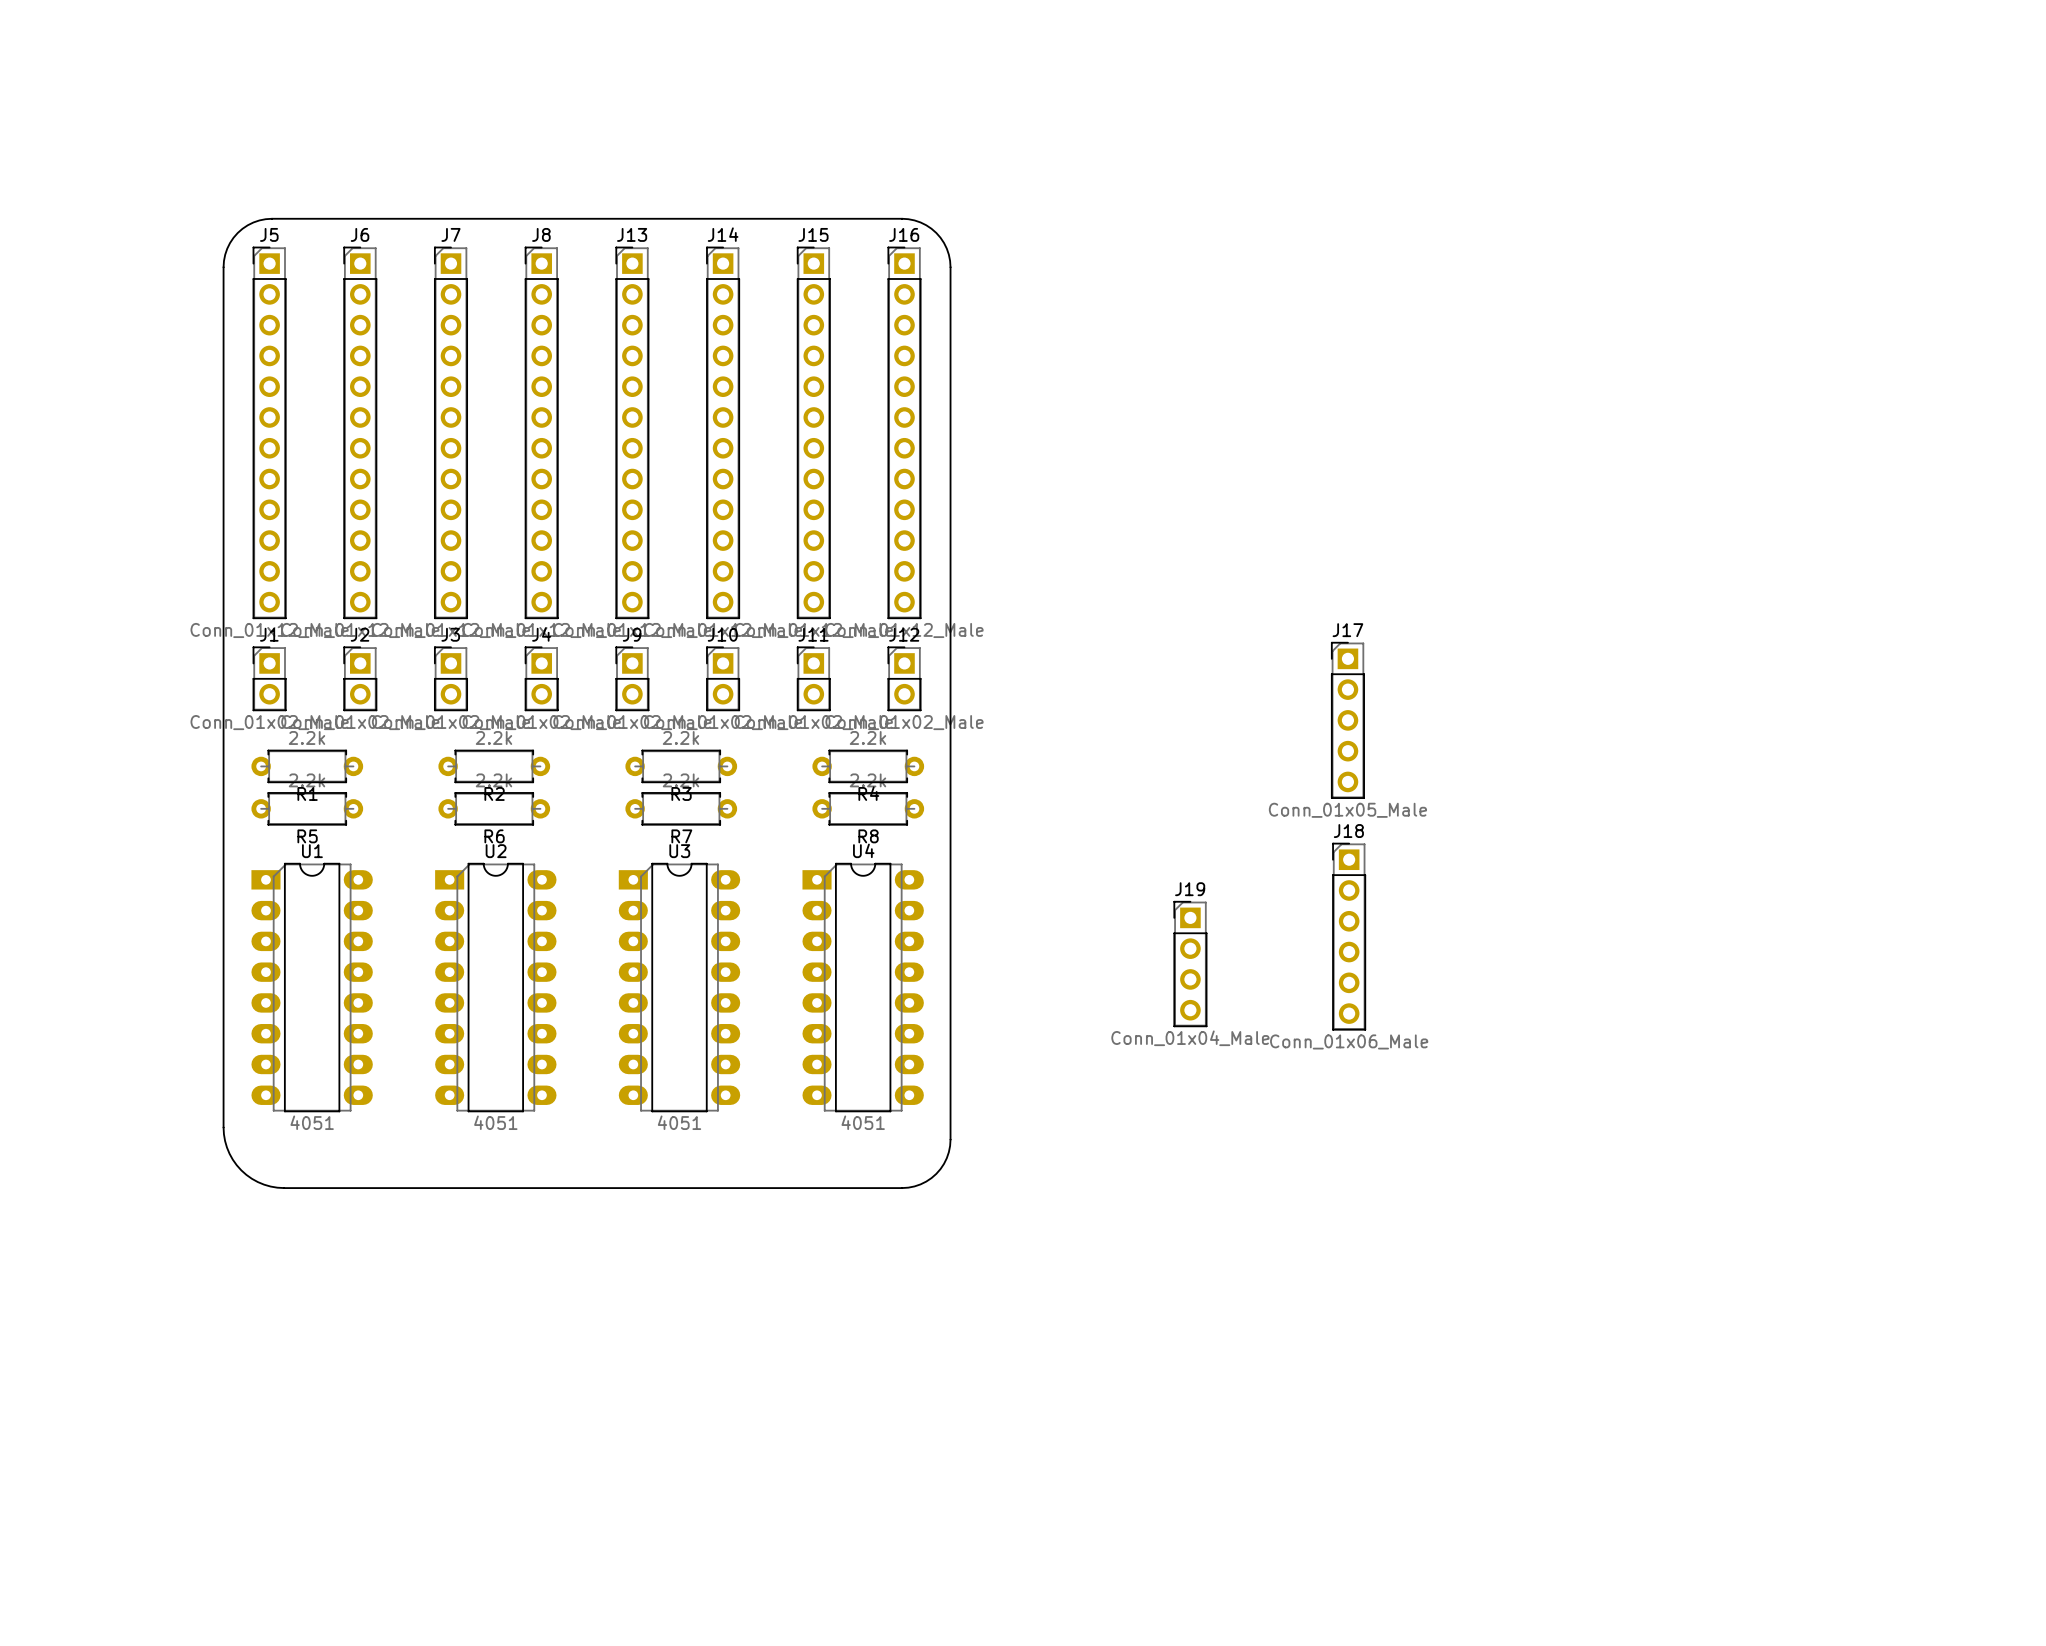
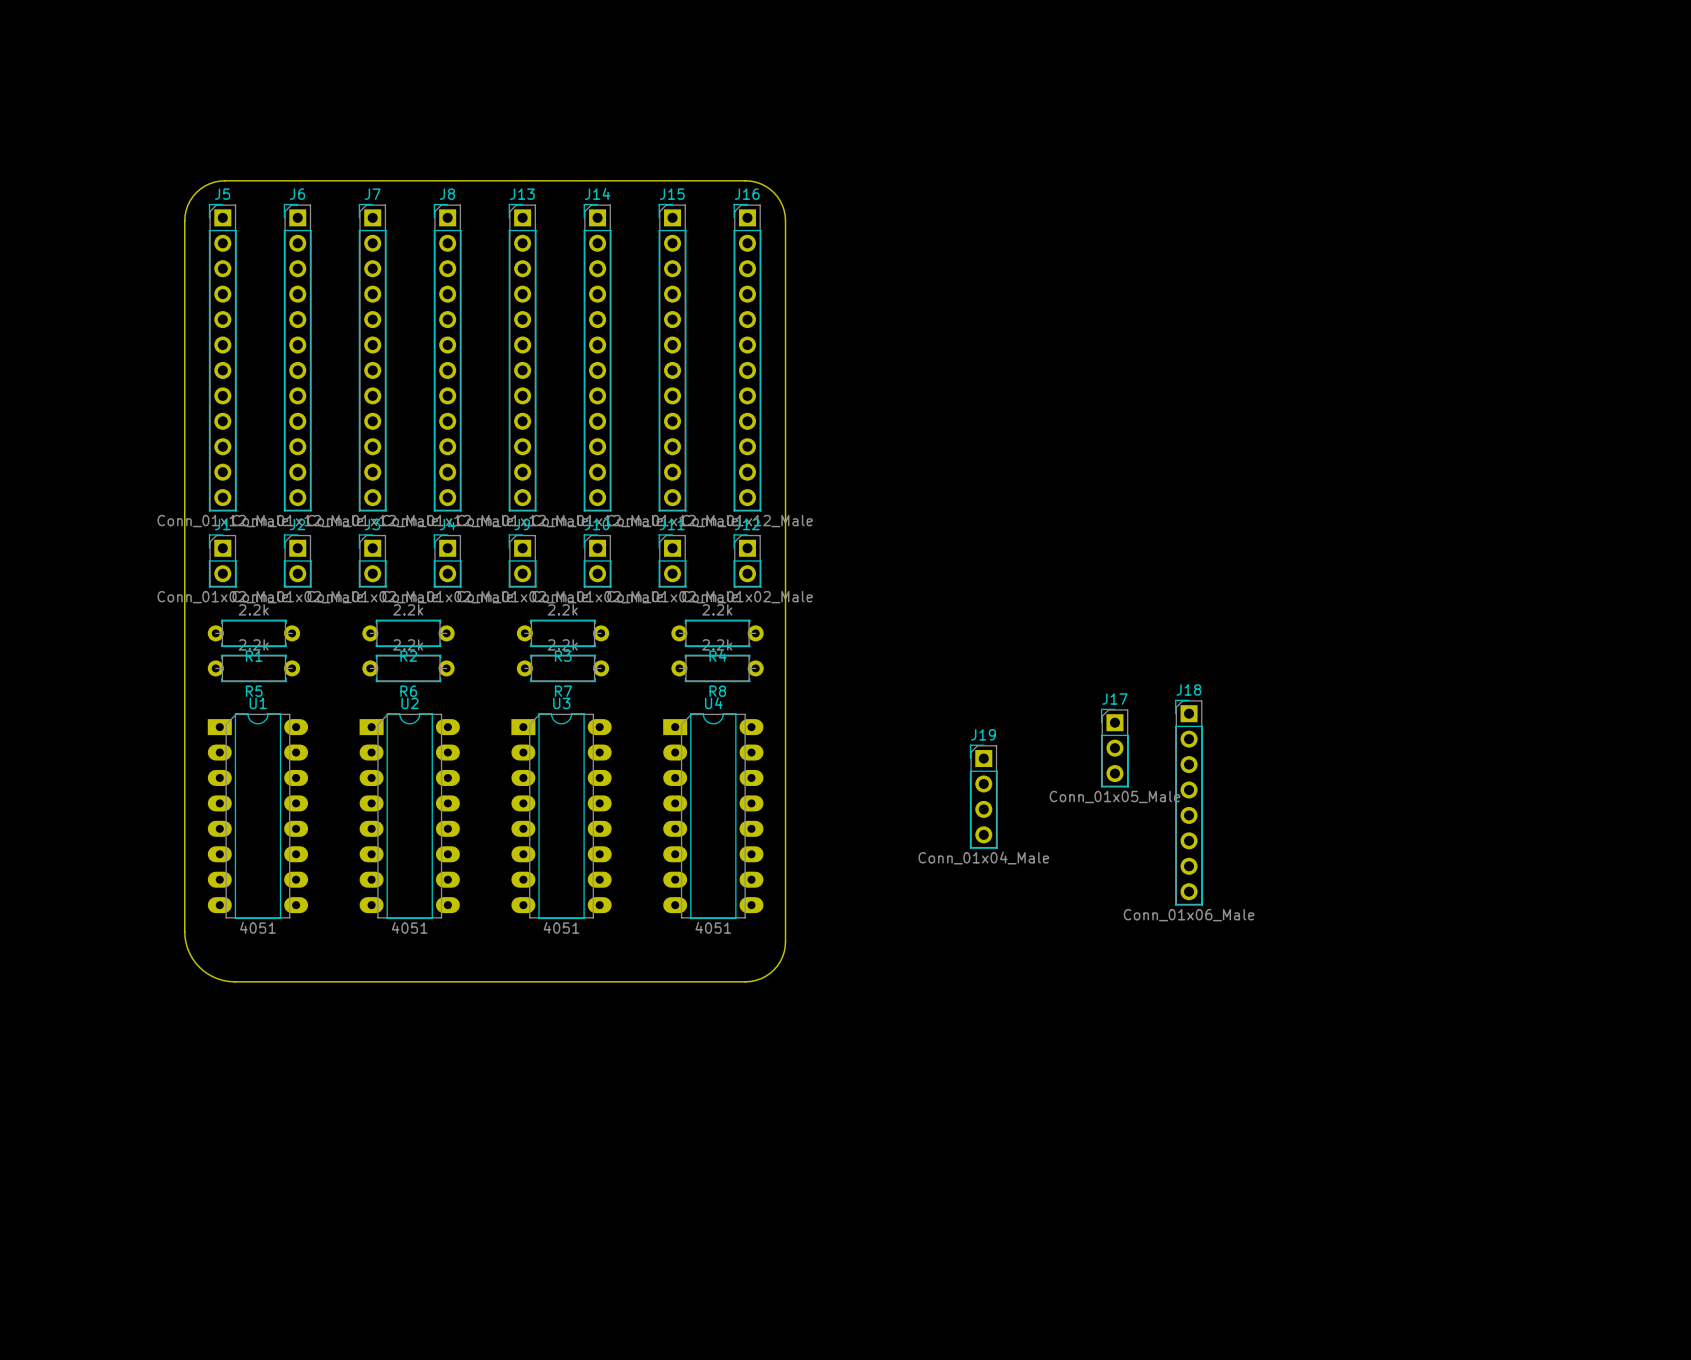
J17 name position: J17 (1347, 630) -> J17 (1114, 698)
J17 footprint: [1331, 641, 1365, 799] -> [1101, 708, 1129, 788]
J17 value position: Conn_01x05_Male (1347, 810) -> Conn_01x05_Male (1114, 796)
J18 name position: J18 (1348, 831) -> J18 (1188, 689)
J18 footprint: [1332, 842, 1366, 1031] -> [1175, 699, 1203, 906]
J18 value position: Conn_01x06_Male (1349, 1041) -> Conn_01x06_Male (1189, 915)

